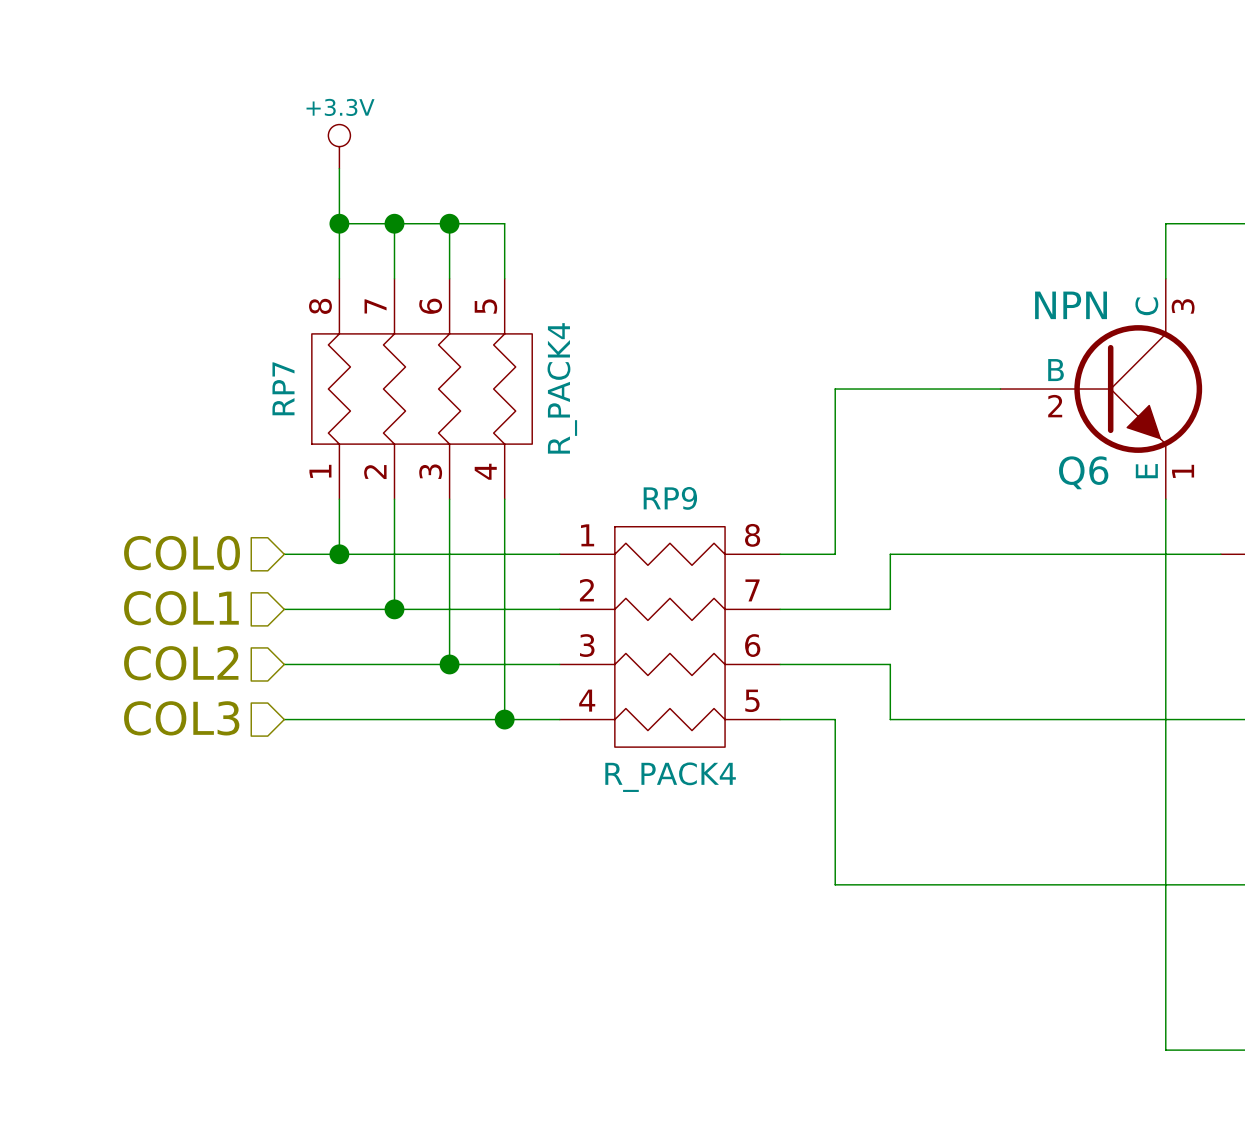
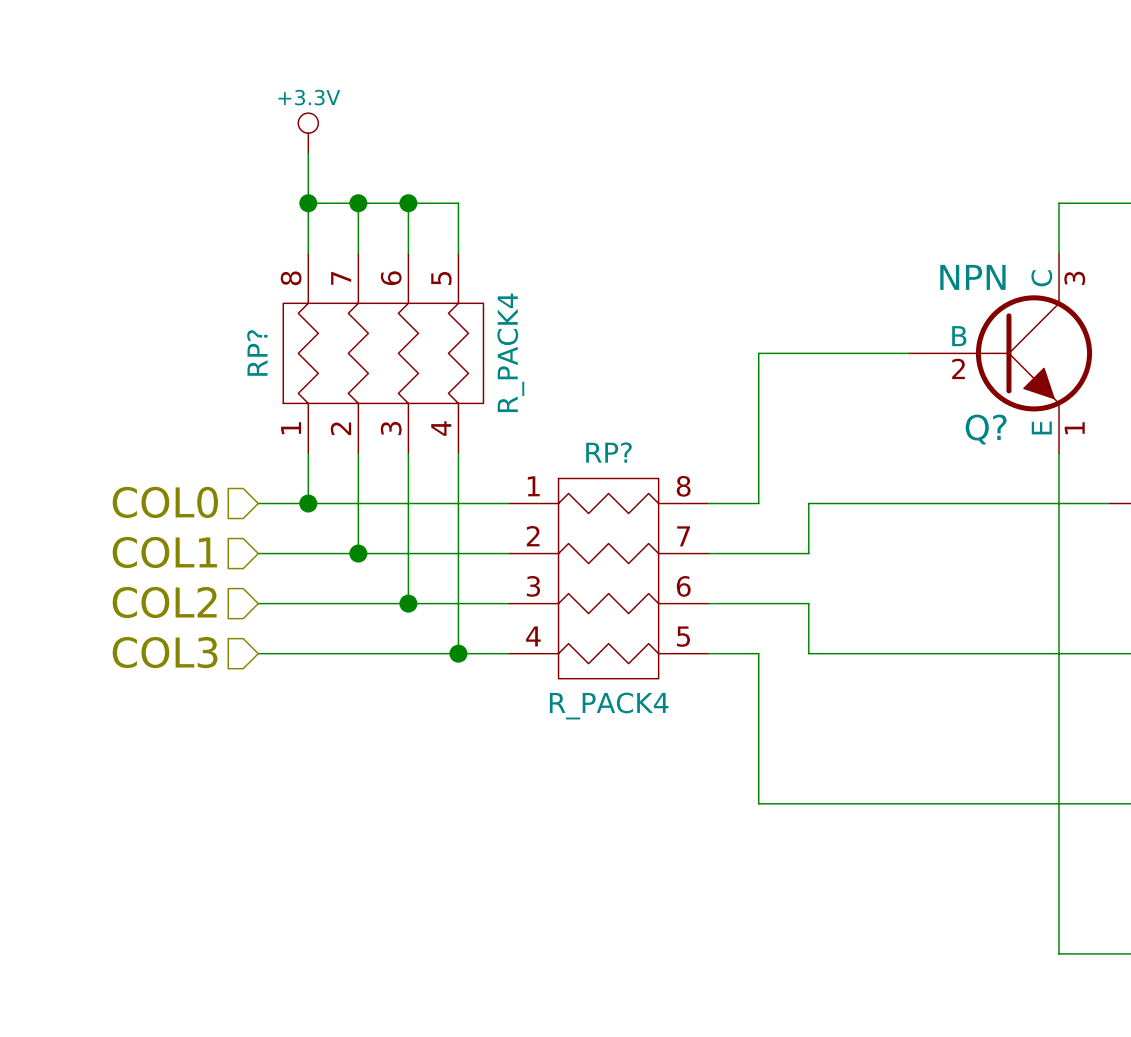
RP7 name: RP7 (283, 388) -> RP? (257, 352)
Q6 name: Q6 (1083, 472) -> Q? (986, 429)
RP9 name: RP9 (670, 498) -> RP? (608, 452)

